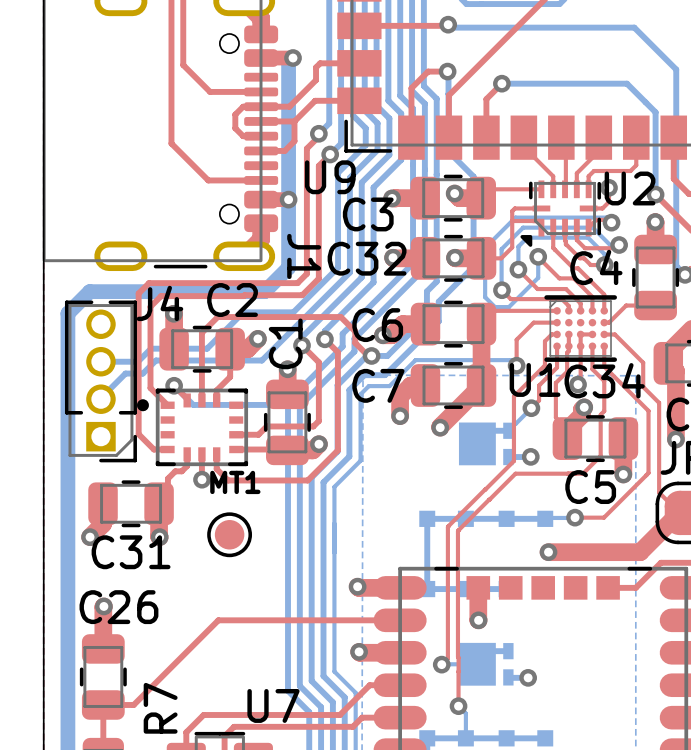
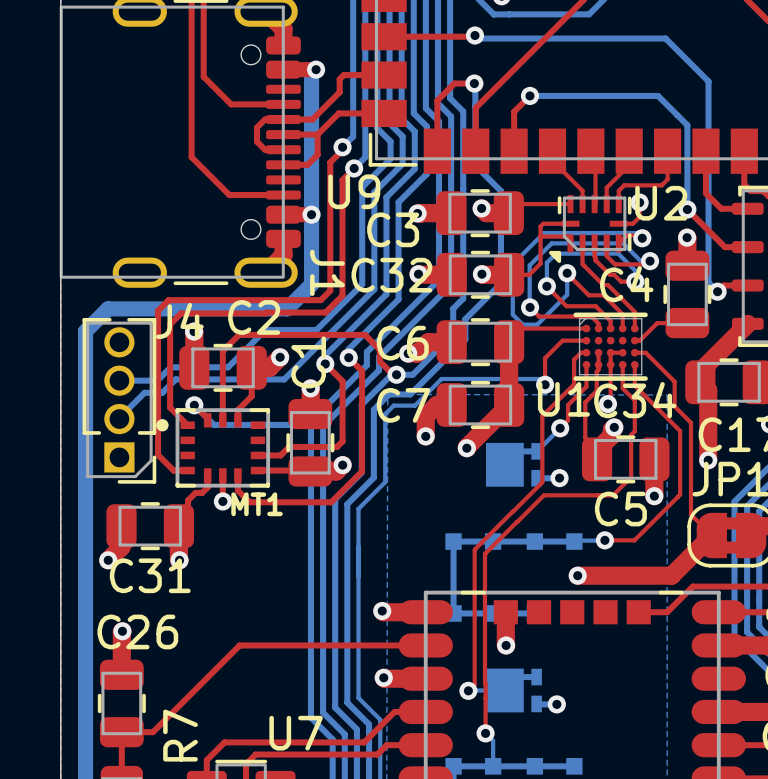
part: (229, 534) -> none

